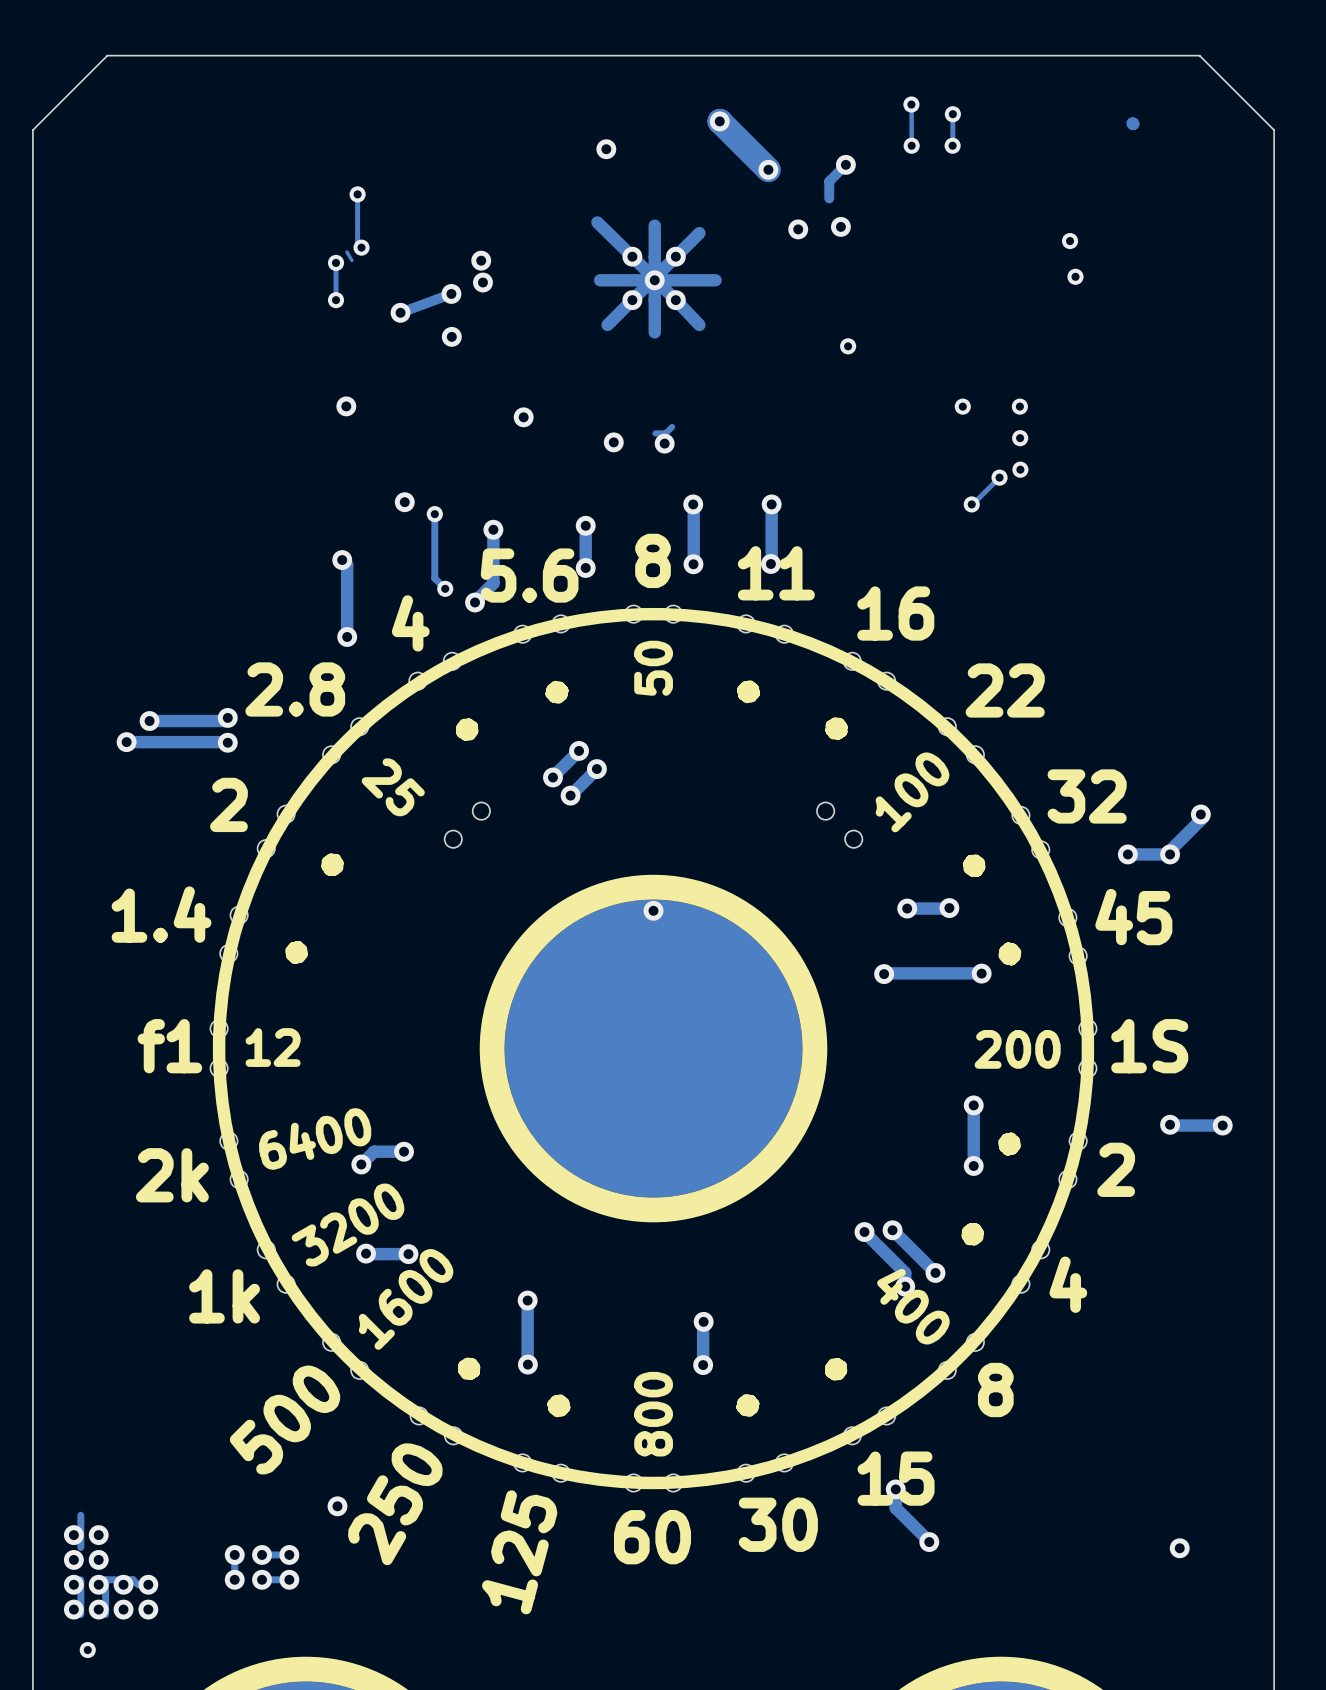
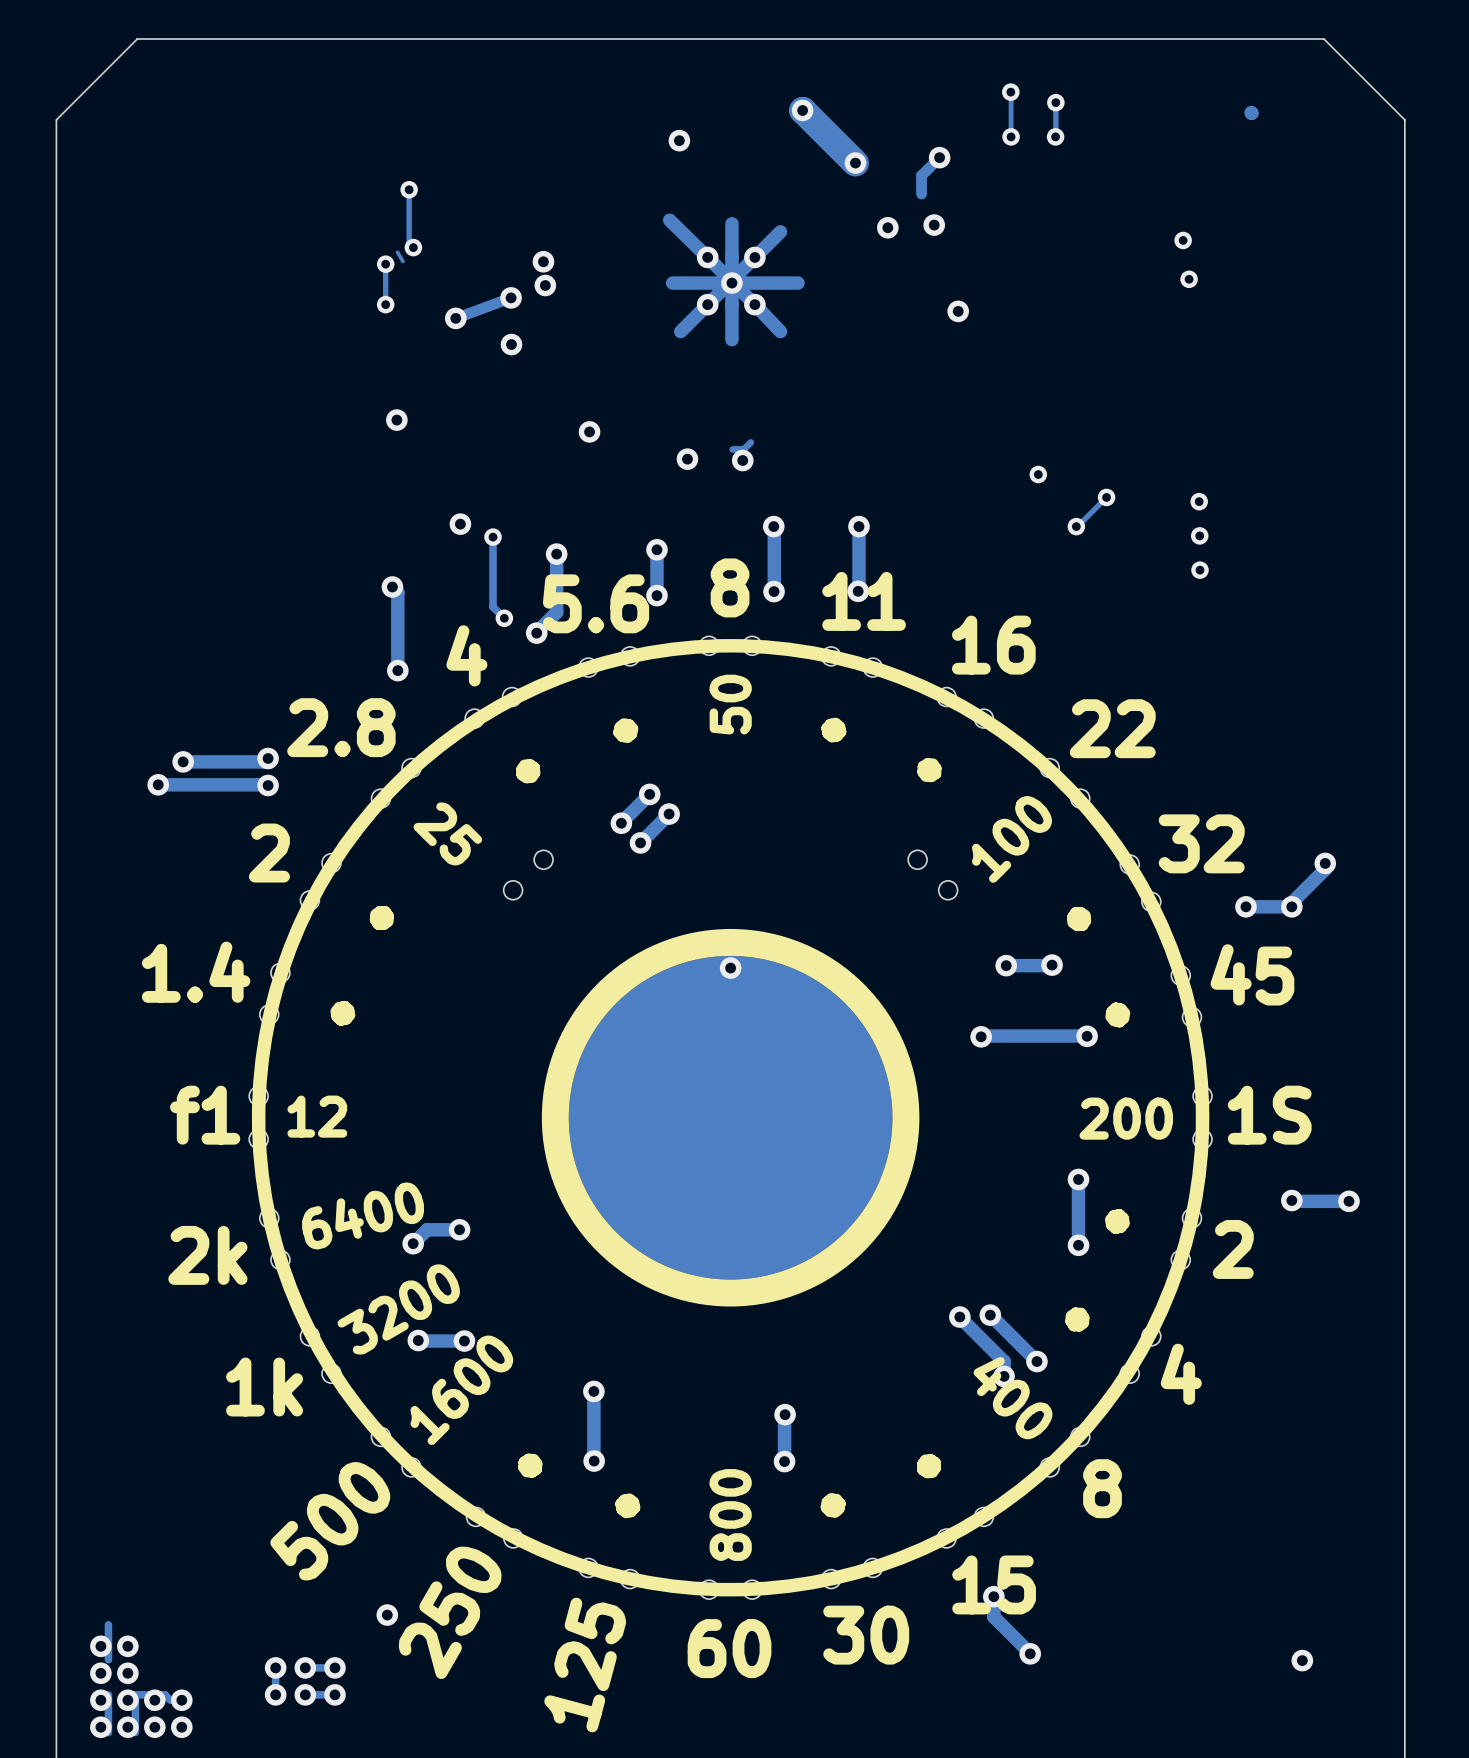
via: none -> (958, 311)
via: (848, 346) -> none
via: (962, 406) -> none
via: (1019, 406) -> none
via: (1020, 438) -> none
via: none -> (1038, 474)
via: (1020, 469) -> none
via: none -> (1199, 501)
via: none -> (1199, 535)
via: none -> (1200, 570)

